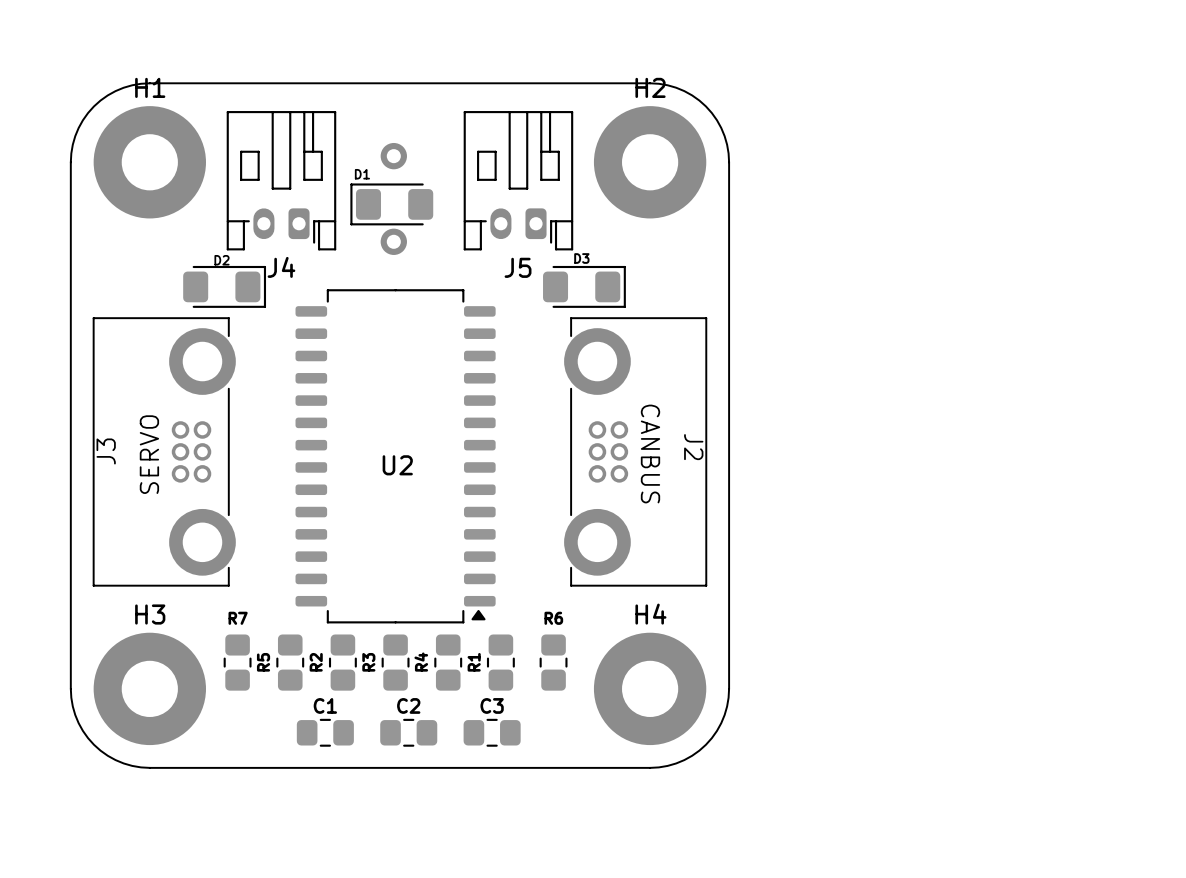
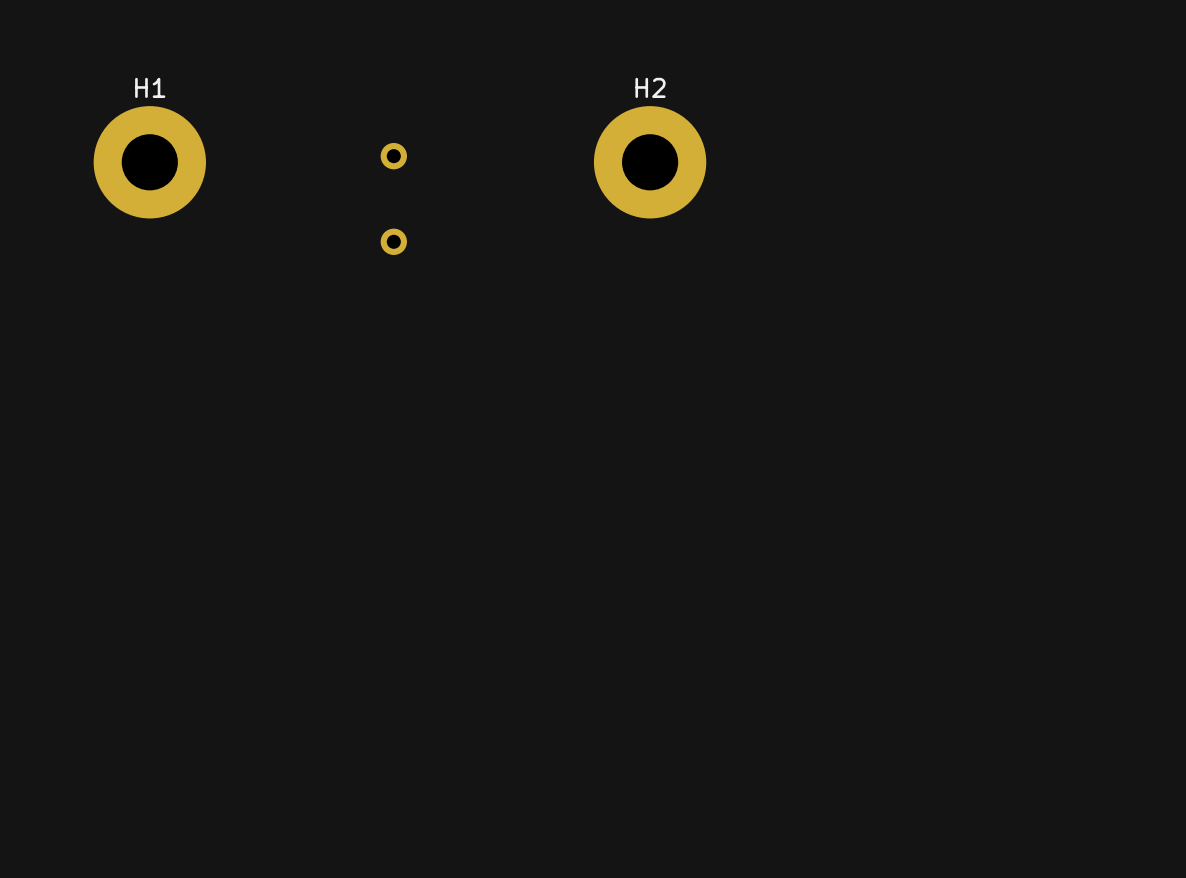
board edge: (149, 83) (650, 83) (667, 85) (684, 91) (699, 100) (711, 113) (724, 136) (729, 162) (729, 688) (727, 706) (721, 723) (711, 738) (699, 750) (676, 763) (650, 767) (149, 767) (132, 765) (115, 760) (100, 750) (88, 738) (75, 714) (70, 688) (71, 153) (78, 128) (93, 106) (115, 91) (132, 85) (149, 83) -> none
J4: (281, 180) -> none
J5: (518, 180) -> none
D1: (391, 204) -> none
D2: (224, 286) -> none
D3: (584, 286) -> none
J3: (164, 451) -> none
J2: (635, 451) -> none
text: CANBUS (650, 453) -> none
text: SERVO (149, 454) -> none
U2: (395, 456) -> none
R7: (237, 662) -> none
R5: (290, 662) -> none
R2: (342, 662) -> none
R3: (395, 662) -> none
R4: (448, 662) -> none
R1: (500, 662) -> none
R6: (553, 662) -> none
H3: (149, 688) -> none
H4: (650, 688) -> none
C1: (325, 732) -> none
C2: (408, 732) -> none
C3: (492, 732) -> none

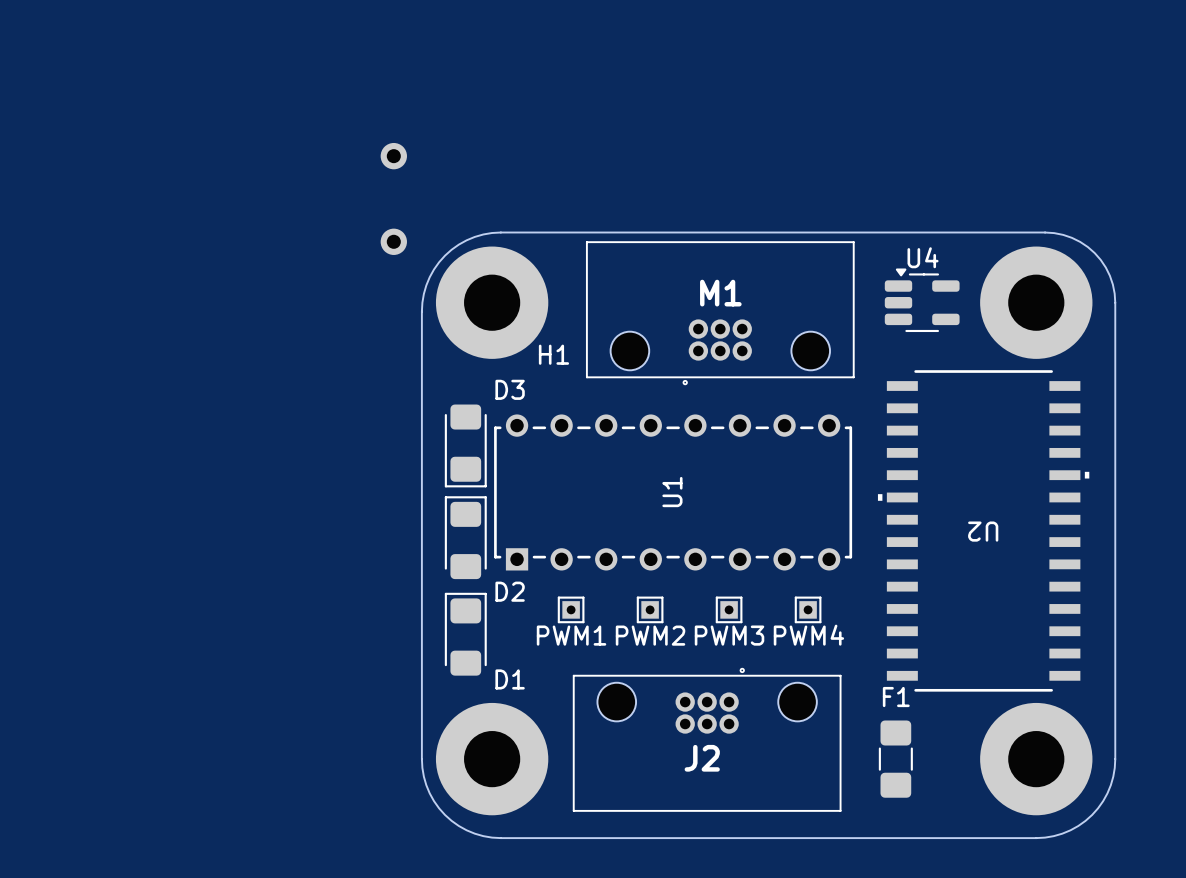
H1 name position: H1 (150, 87) -> H1 (553, 354)
H1 position: (149, 162) -> (492, 302)
H2: (650, 162) -> none
board edge: none -> (500, 232) (1045, 232) (1071, 237) (1094, 253) (1109, 275) (1115, 302) (1115, 759) (1110, 785) (1103, 801) (1092, 814) (1078, 825) (1062, 833) (1036, 838) (500, 838) (483, 836) (466, 830) (445, 814) (429, 793) (423, 776) (421, 759) (422, 302) (429, 277) (445, 255) (466, 240) (483, 234) (500, 232)
U4: none -> (922, 300)
part: none -> (1036, 302)
M1: none -> (720, 313)
D3: none -> (465, 445)
U1: none -> (673, 492)
U2: none -> (983, 530)
D2: none -> (465, 537)
PWM1: none -> (571, 609)
PWM2: none -> (650, 609)
PWM3: none -> (729, 609)
PWM4: none -> (808, 609)
D1: none -> (465, 634)
J2: none -> (707, 739)
part: none -> (492, 759)
F1: none -> (895, 759)
part: none -> (1036, 759)

